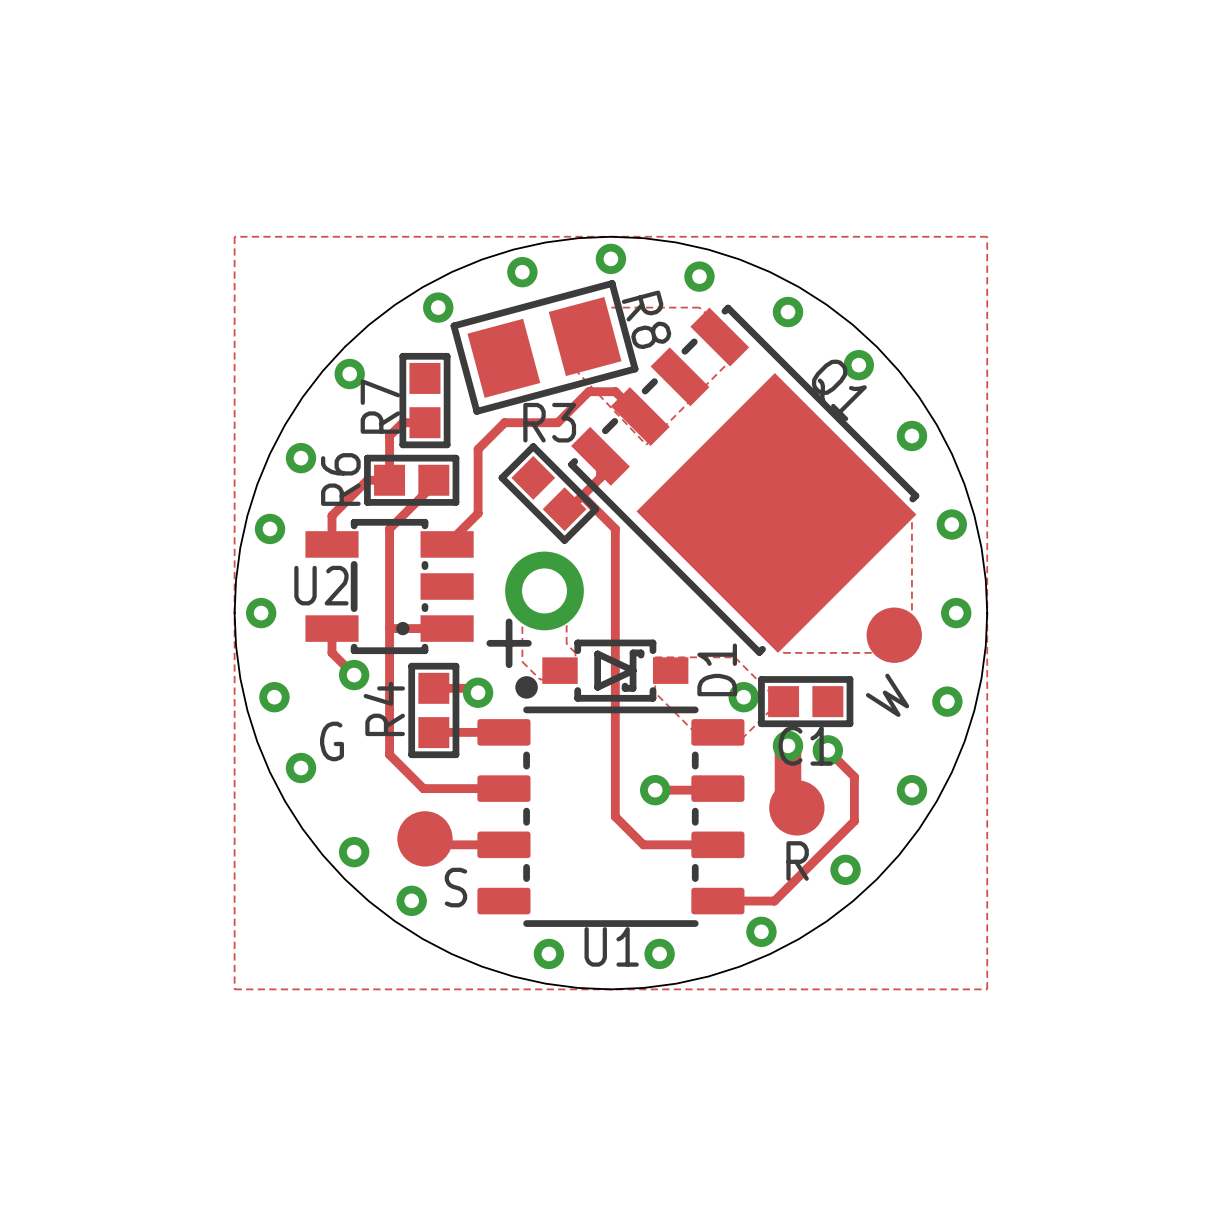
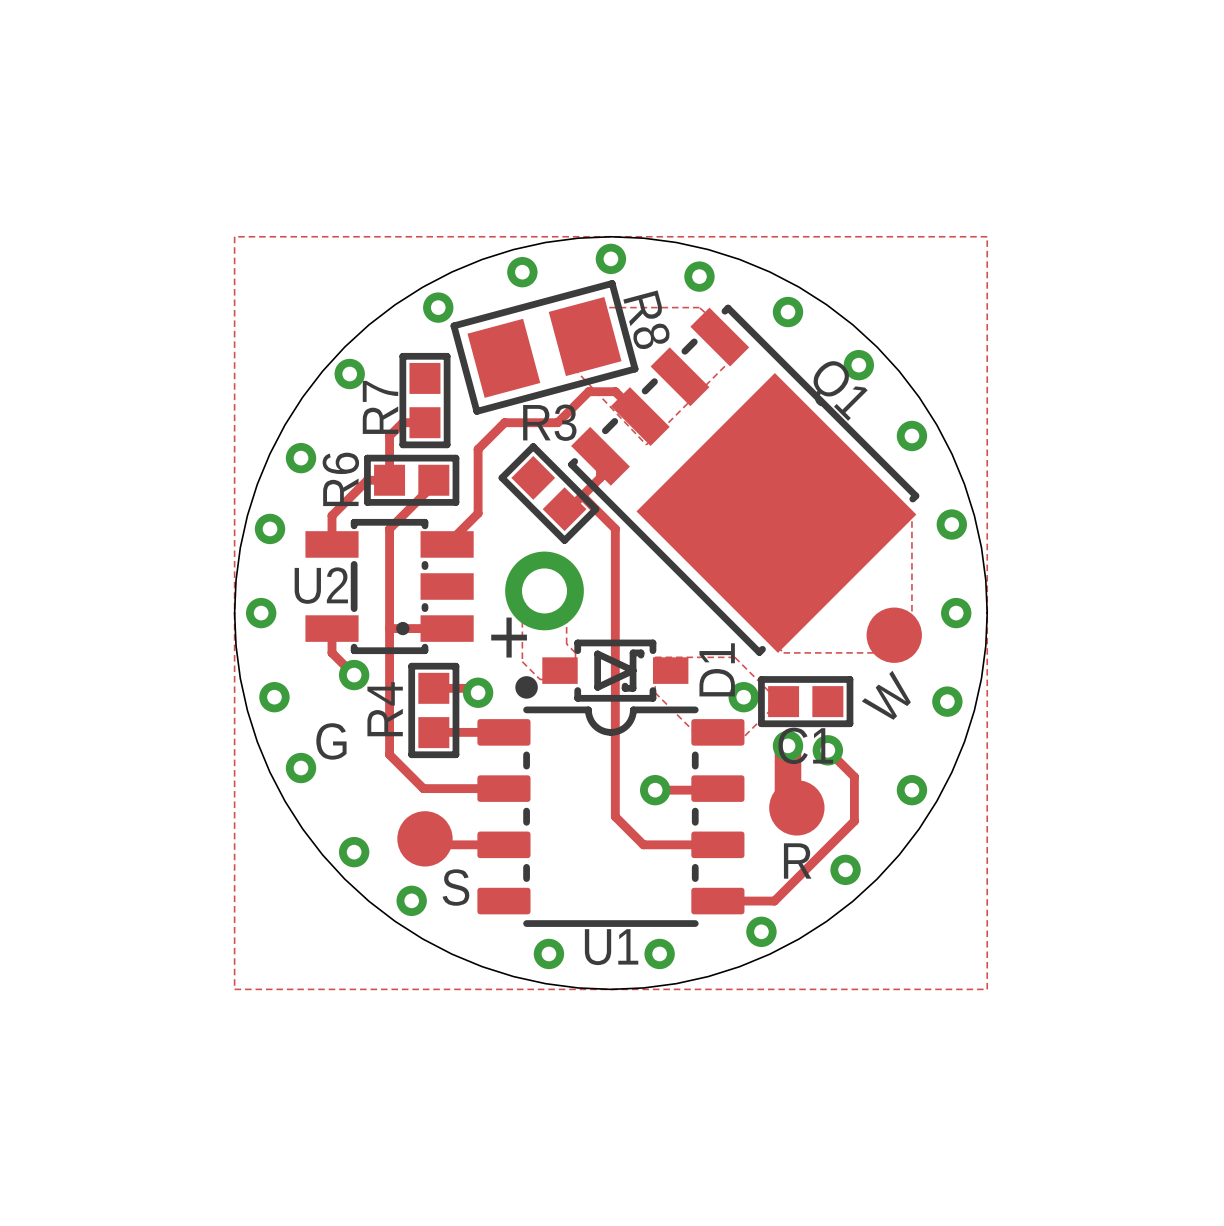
U1 footprint: [477, 676, 745, 927] -> [477, 676, 745, 927]

